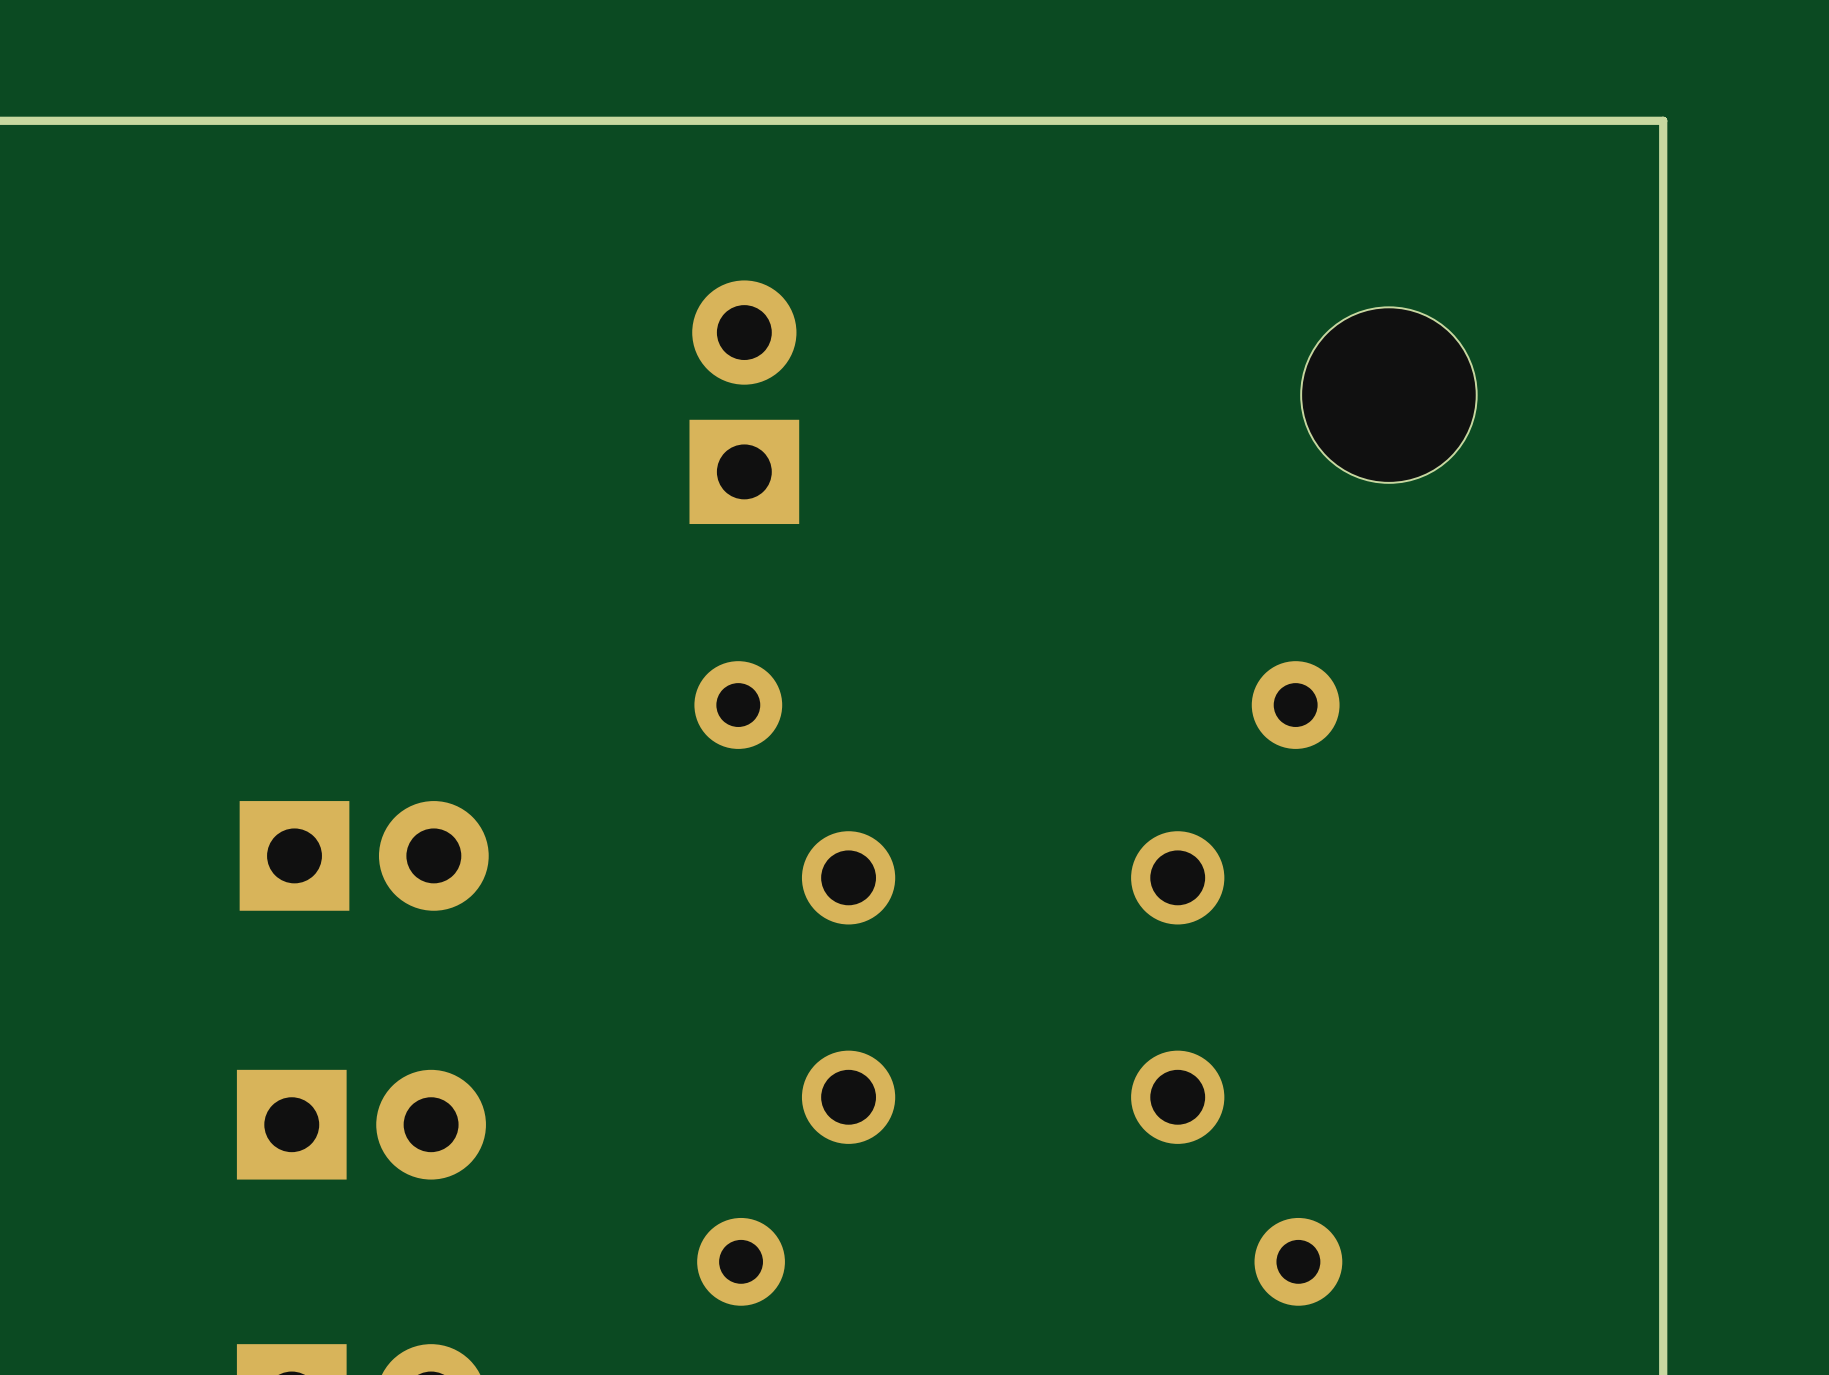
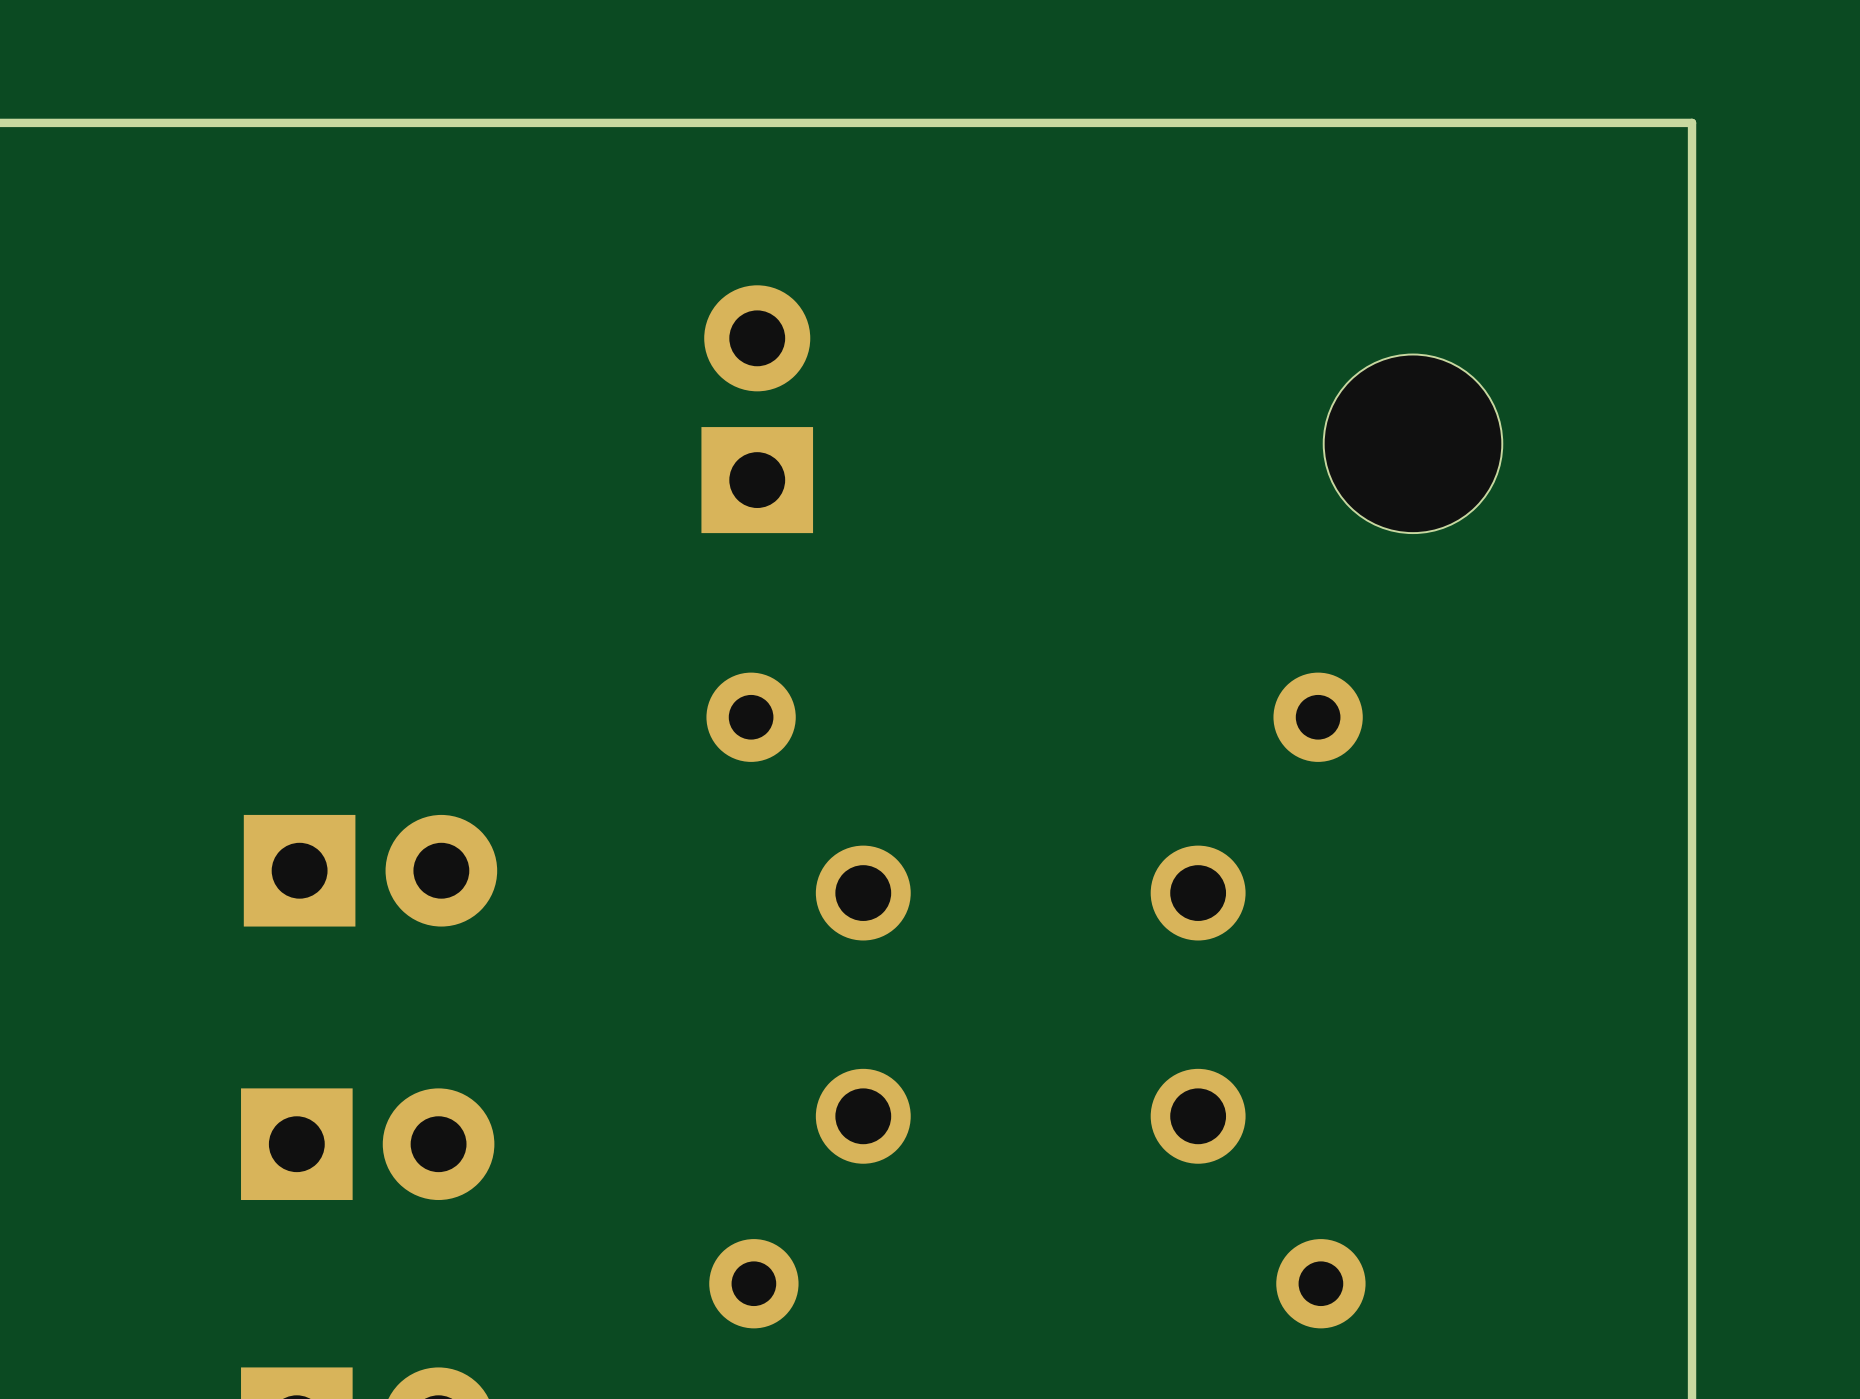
part position: (1388, 395) -> (1412, 443)

